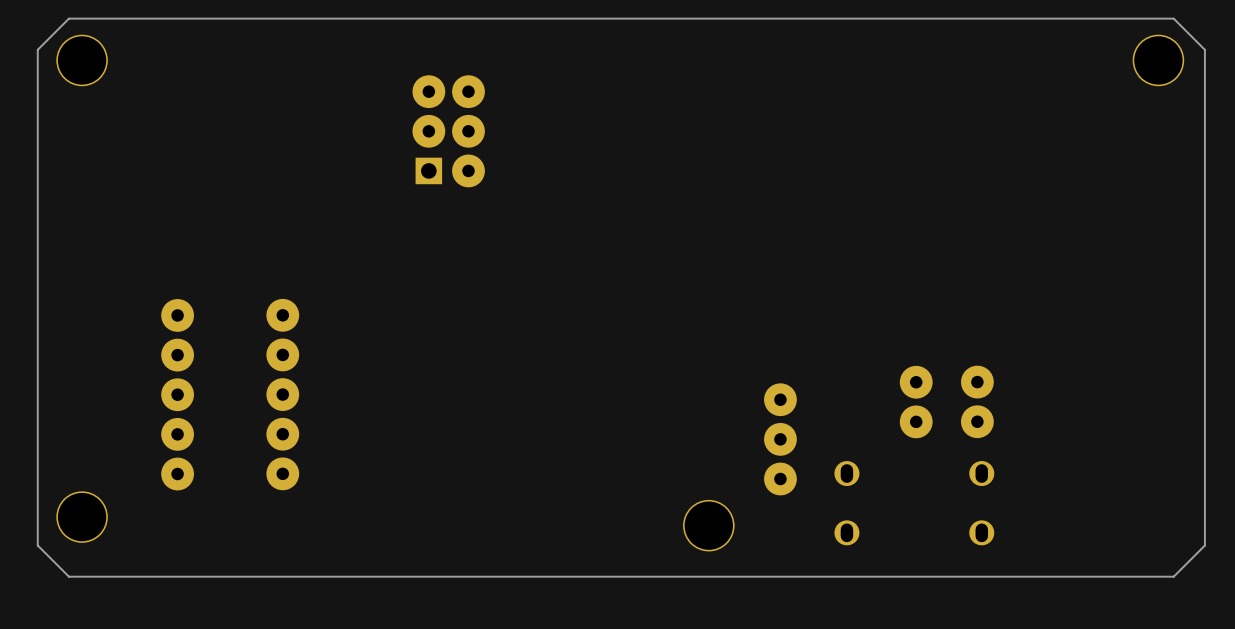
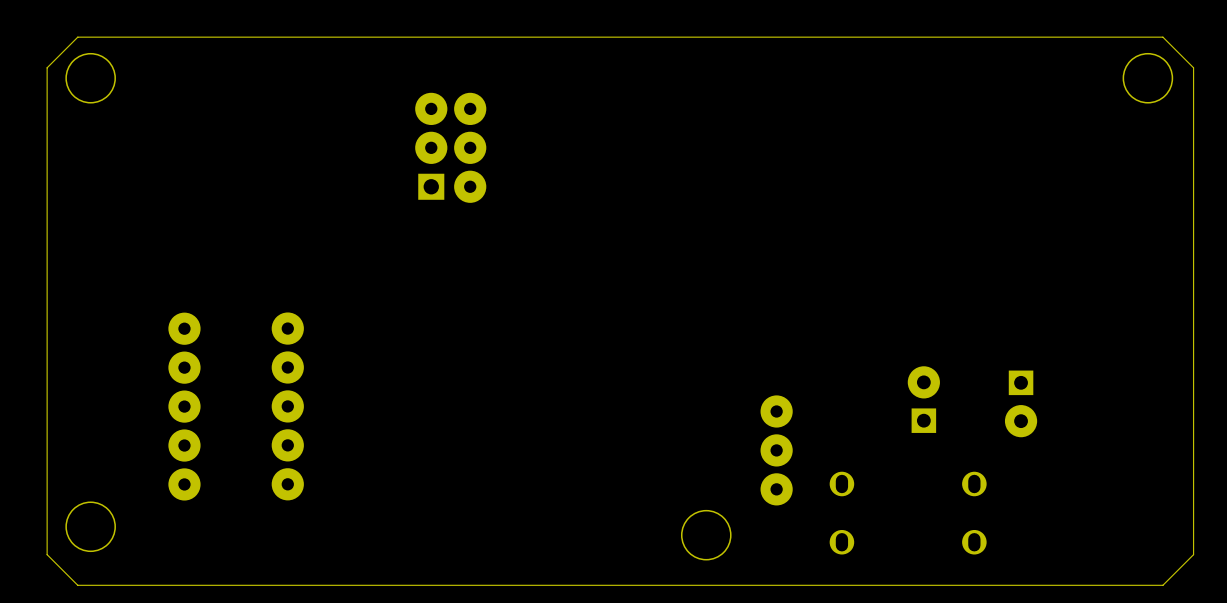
part: none -> (923, 399)
part: none -> (1021, 403)
part: (977, 401) -> none
part: (916, 402) -> none

